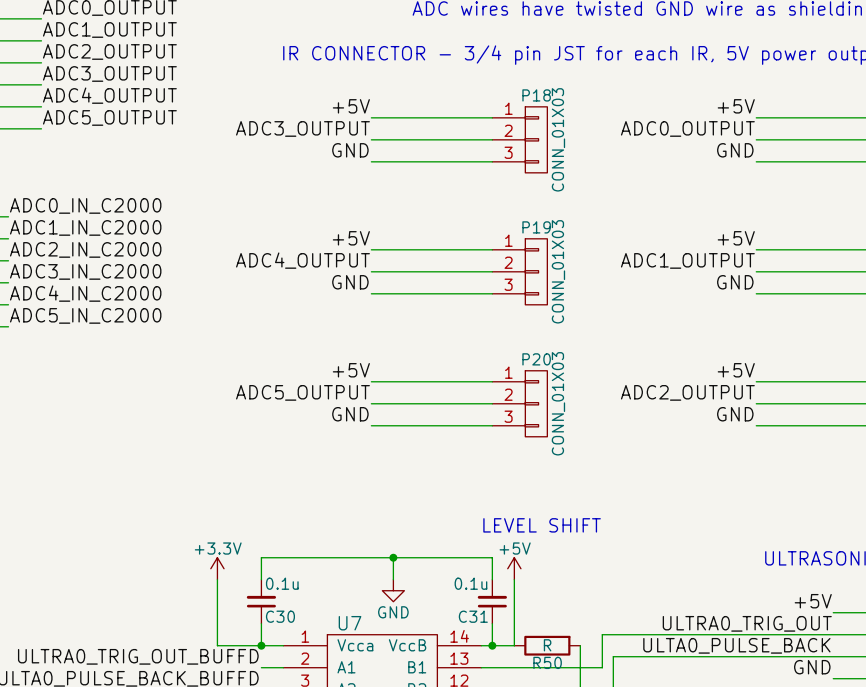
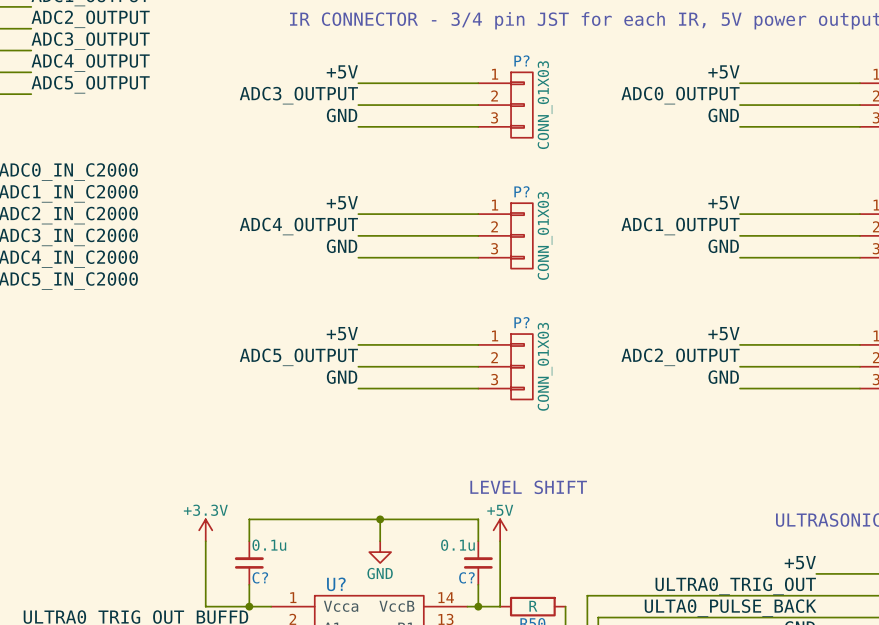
P18 name: P18 (536, 95) -> P? (521, 60)
P19 name: P19 (536, 227) -> P? (521, 191)
P20 name: P20 (536, 359) -> P? (521, 322)
C30 name: C30 (280, 616) -> C? (260, 577)
C31 name: C31 (473, 616) -> C? (466, 577)
U7 name: U7 (350, 623) -> U? (336, 584)

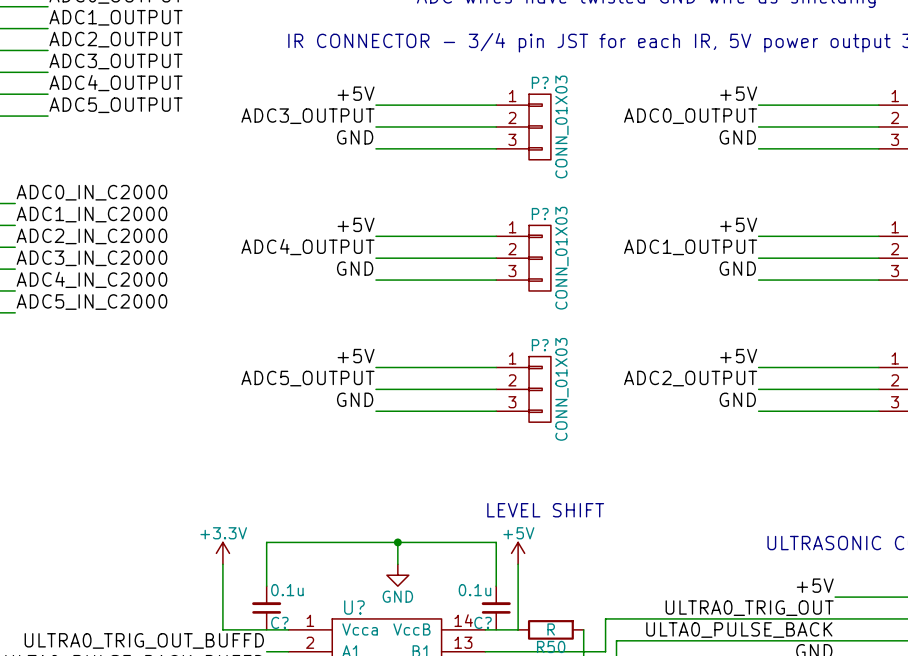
C? position: (249, 563) -> (266, 608)
C? position: (478, 563) -> (496, 608)
junction: (249, 606) -> none
junction: (478, 606) -> none

